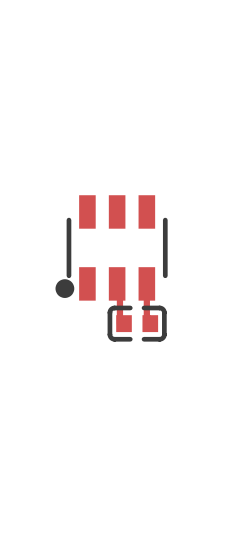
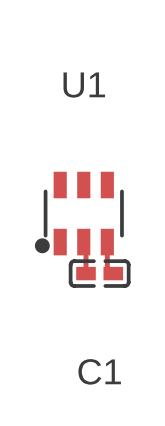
U1 name: none -> U1 (84, 85)
part: (137, 323) -> none
C1: none -> (99, 273)

